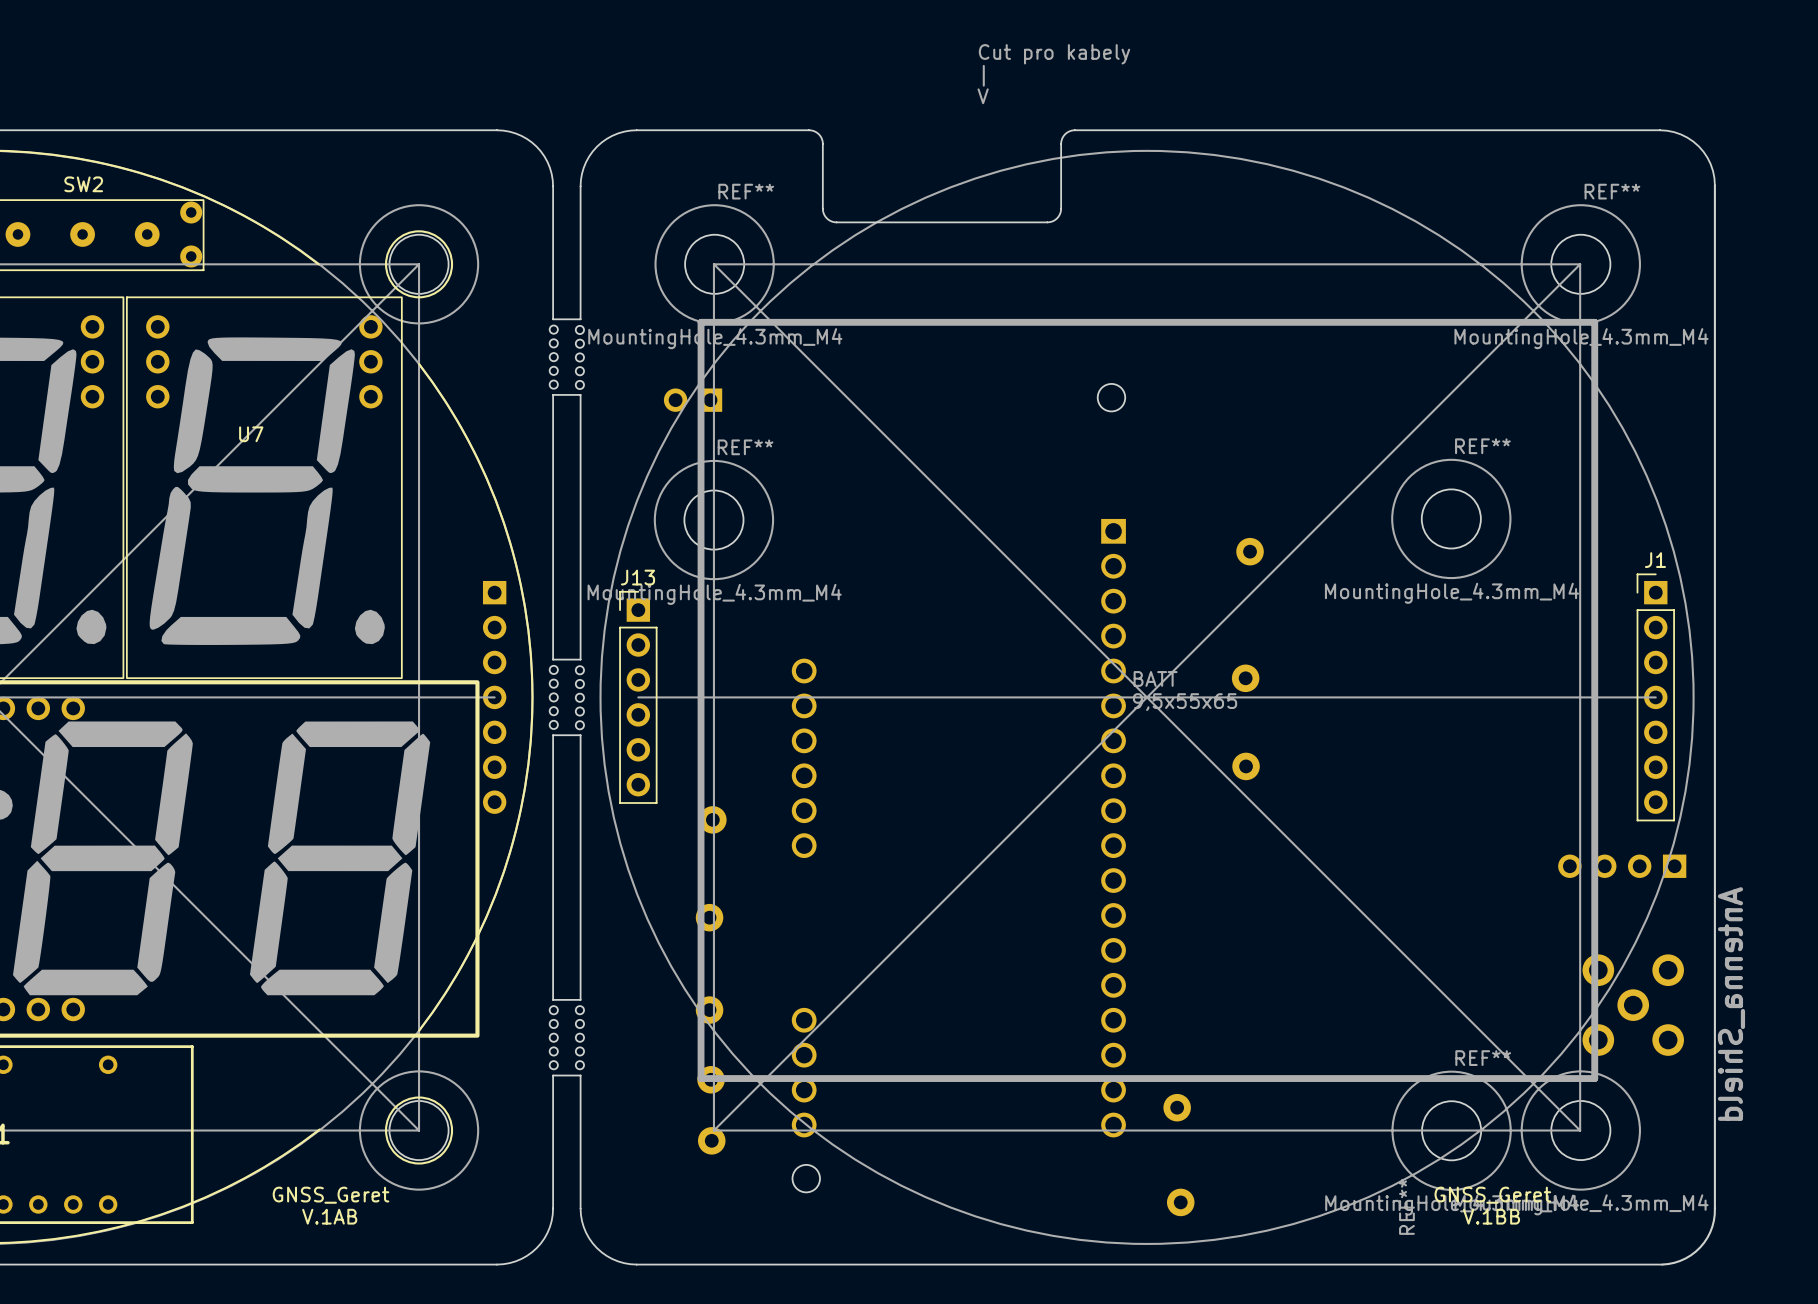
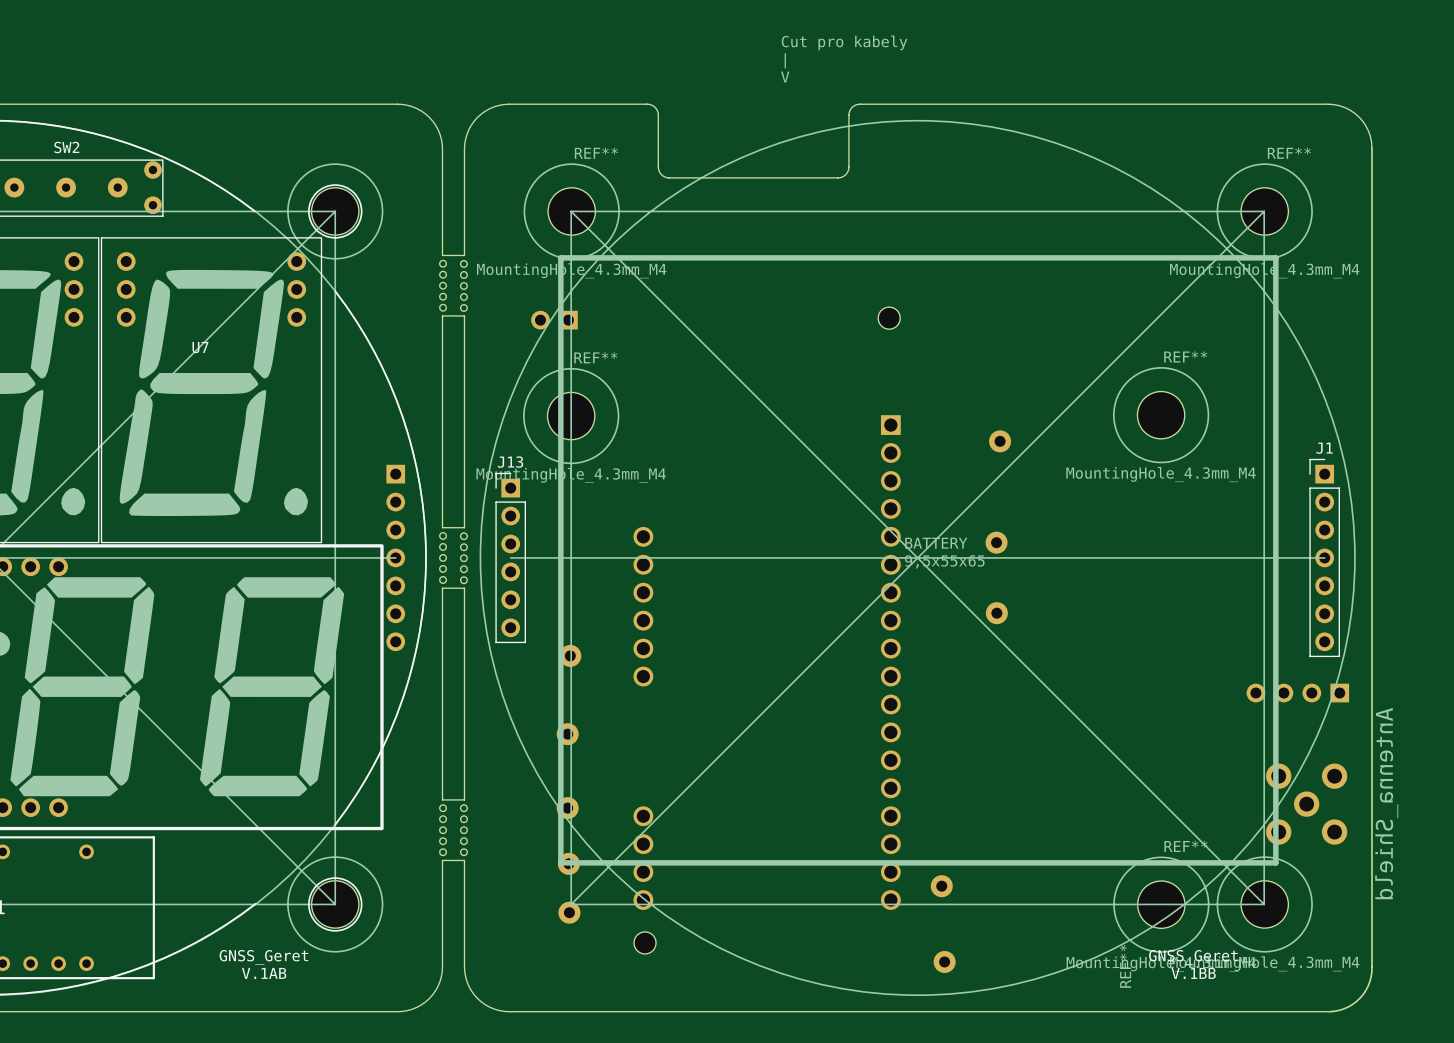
text: BATT (1155, 678) -> BATTERY (936, 543)

